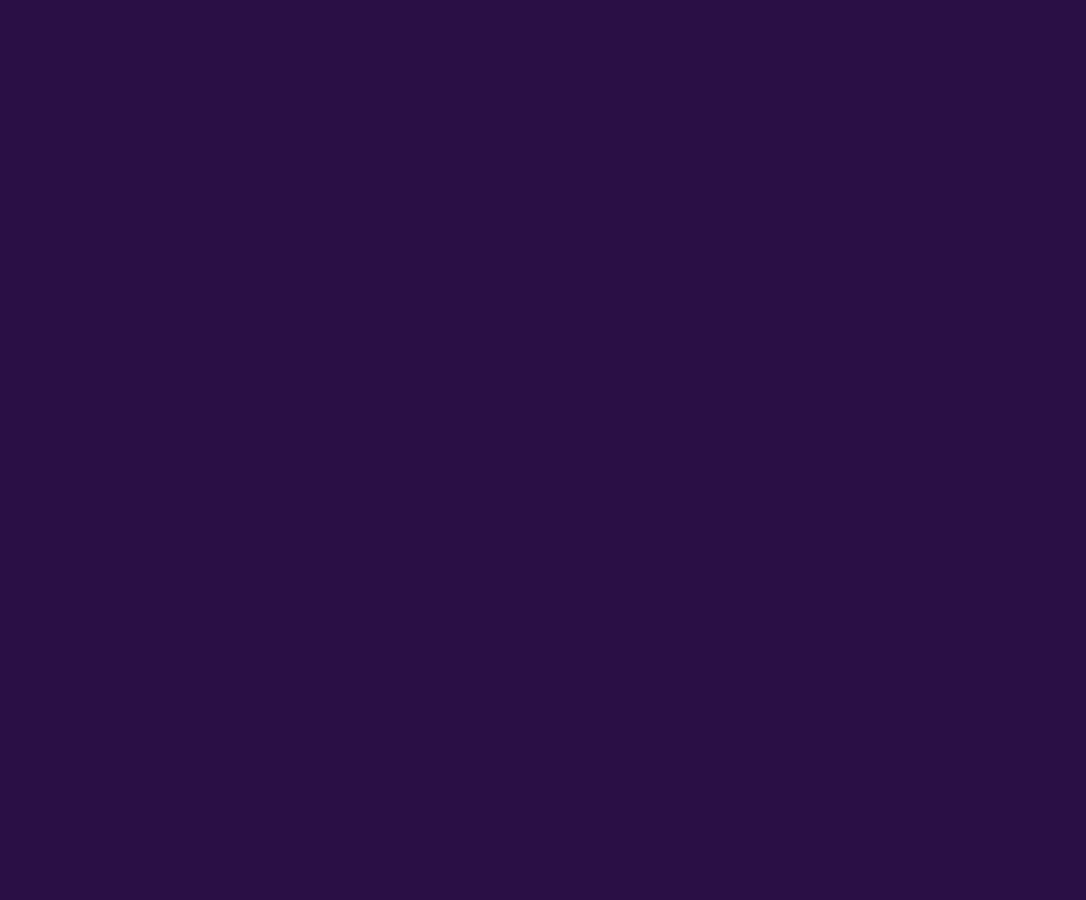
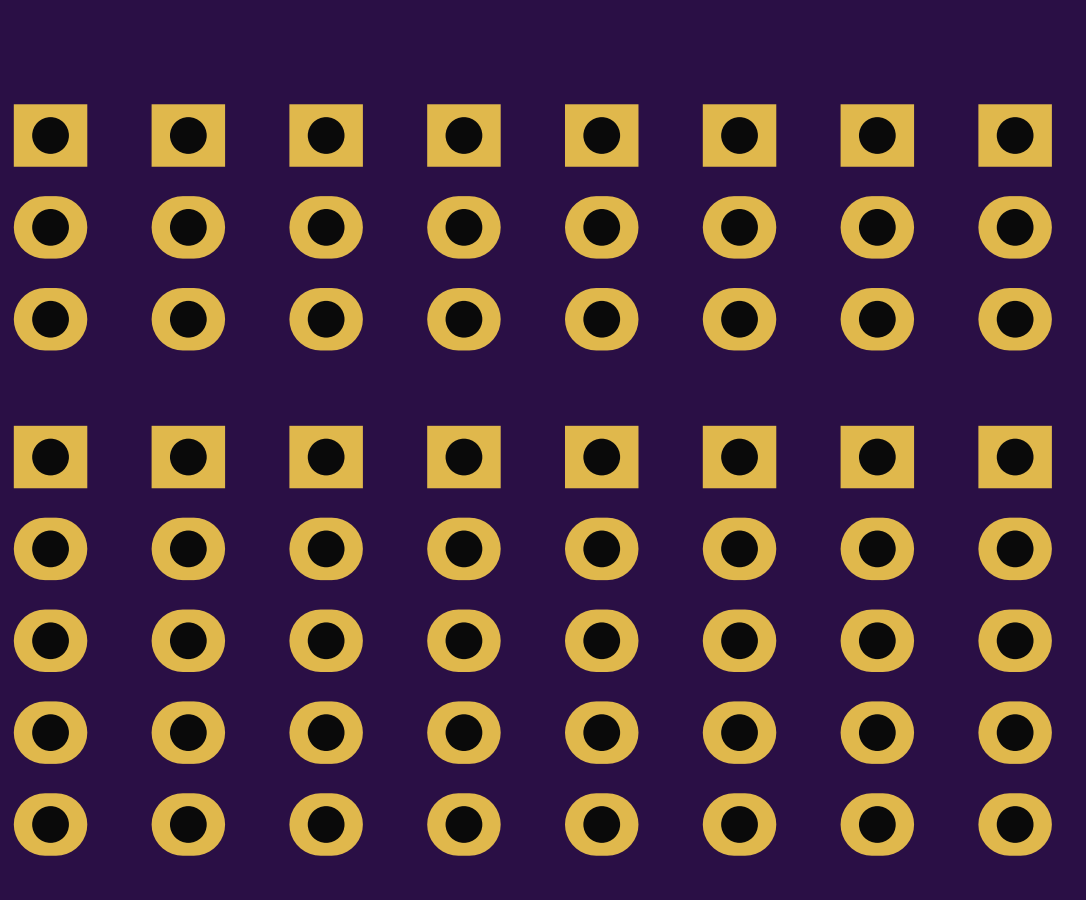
part: none -> (50, 227)
part: none -> (188, 227)
part: none -> (326, 227)
part: none -> (463, 227)
part: none -> (601, 227)
part: none -> (739, 227)
part: none -> (877, 227)
part: none -> (1015, 227)
part: none -> (50, 640)
part: none -> (188, 640)
part: none -> (326, 640)
part: none -> (463, 640)
part: none -> (601, 640)
part: none -> (739, 640)
part: none -> (877, 640)
part: none -> (1015, 640)

